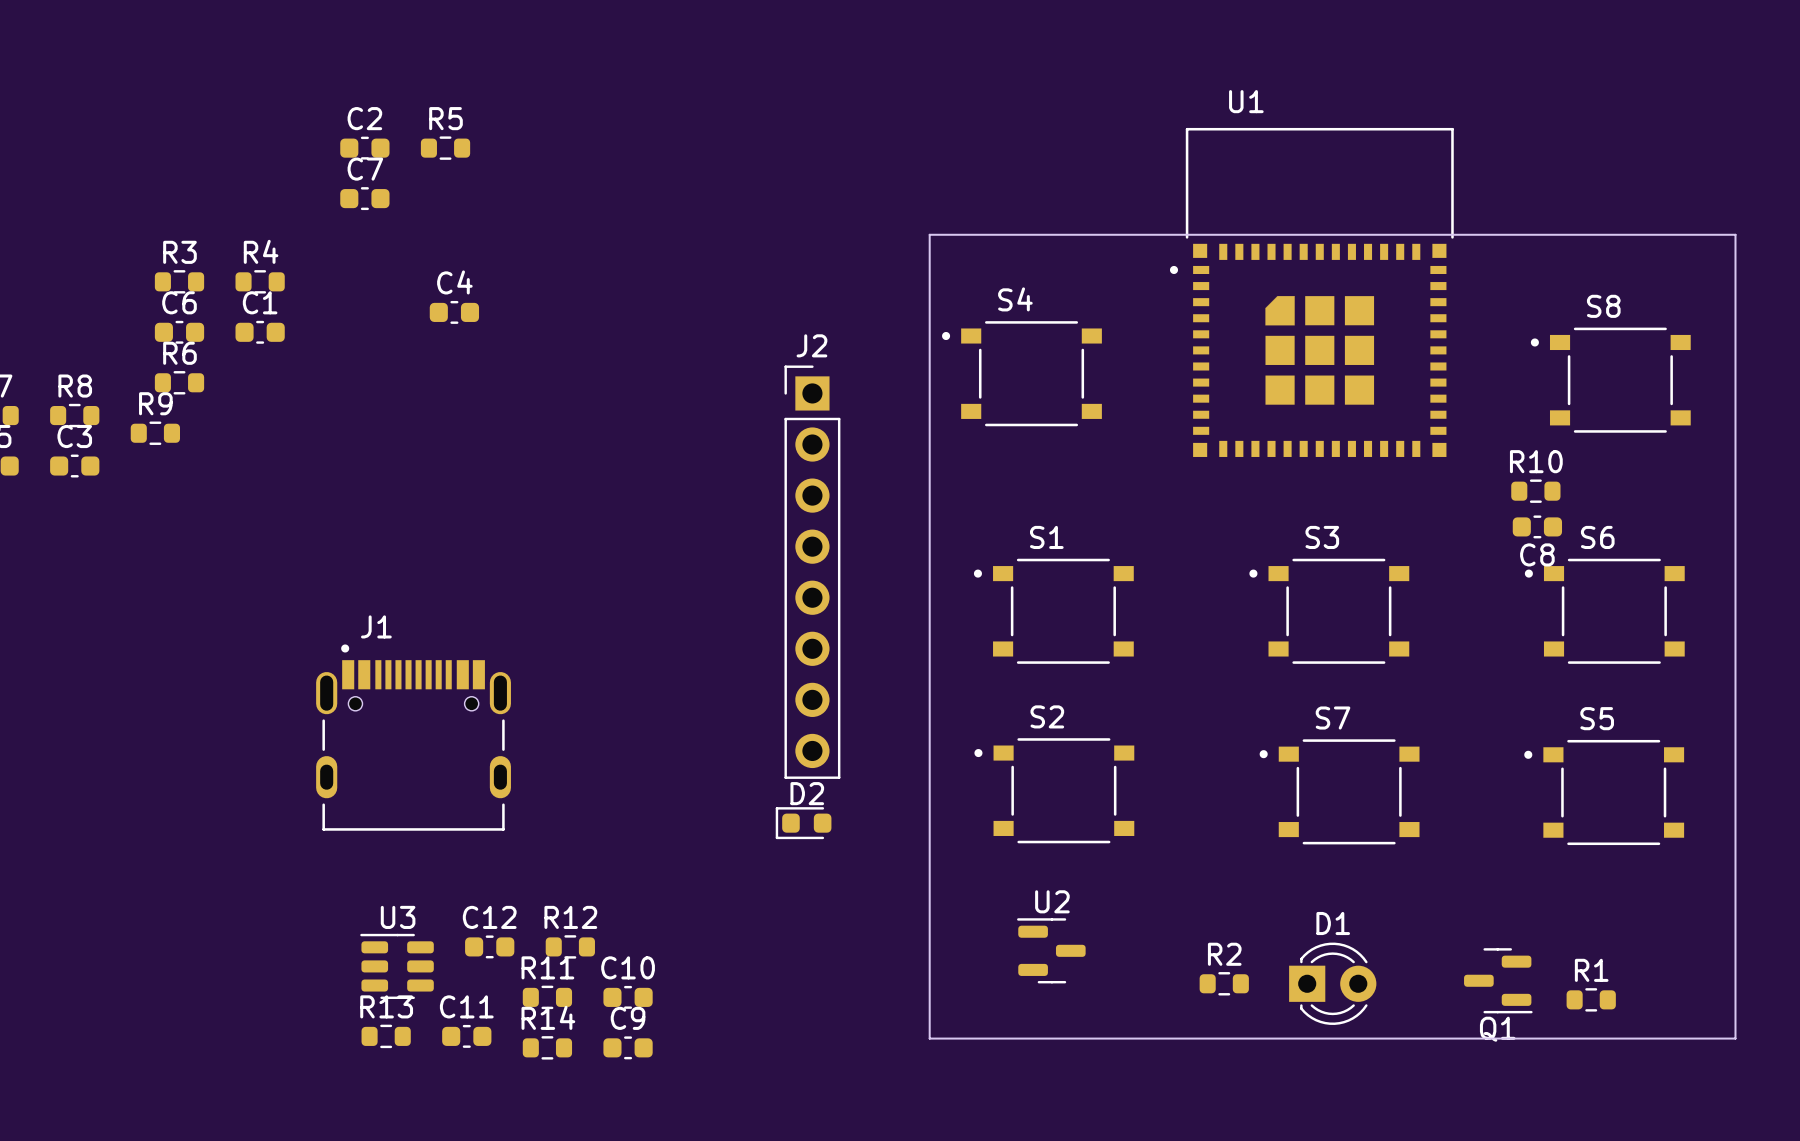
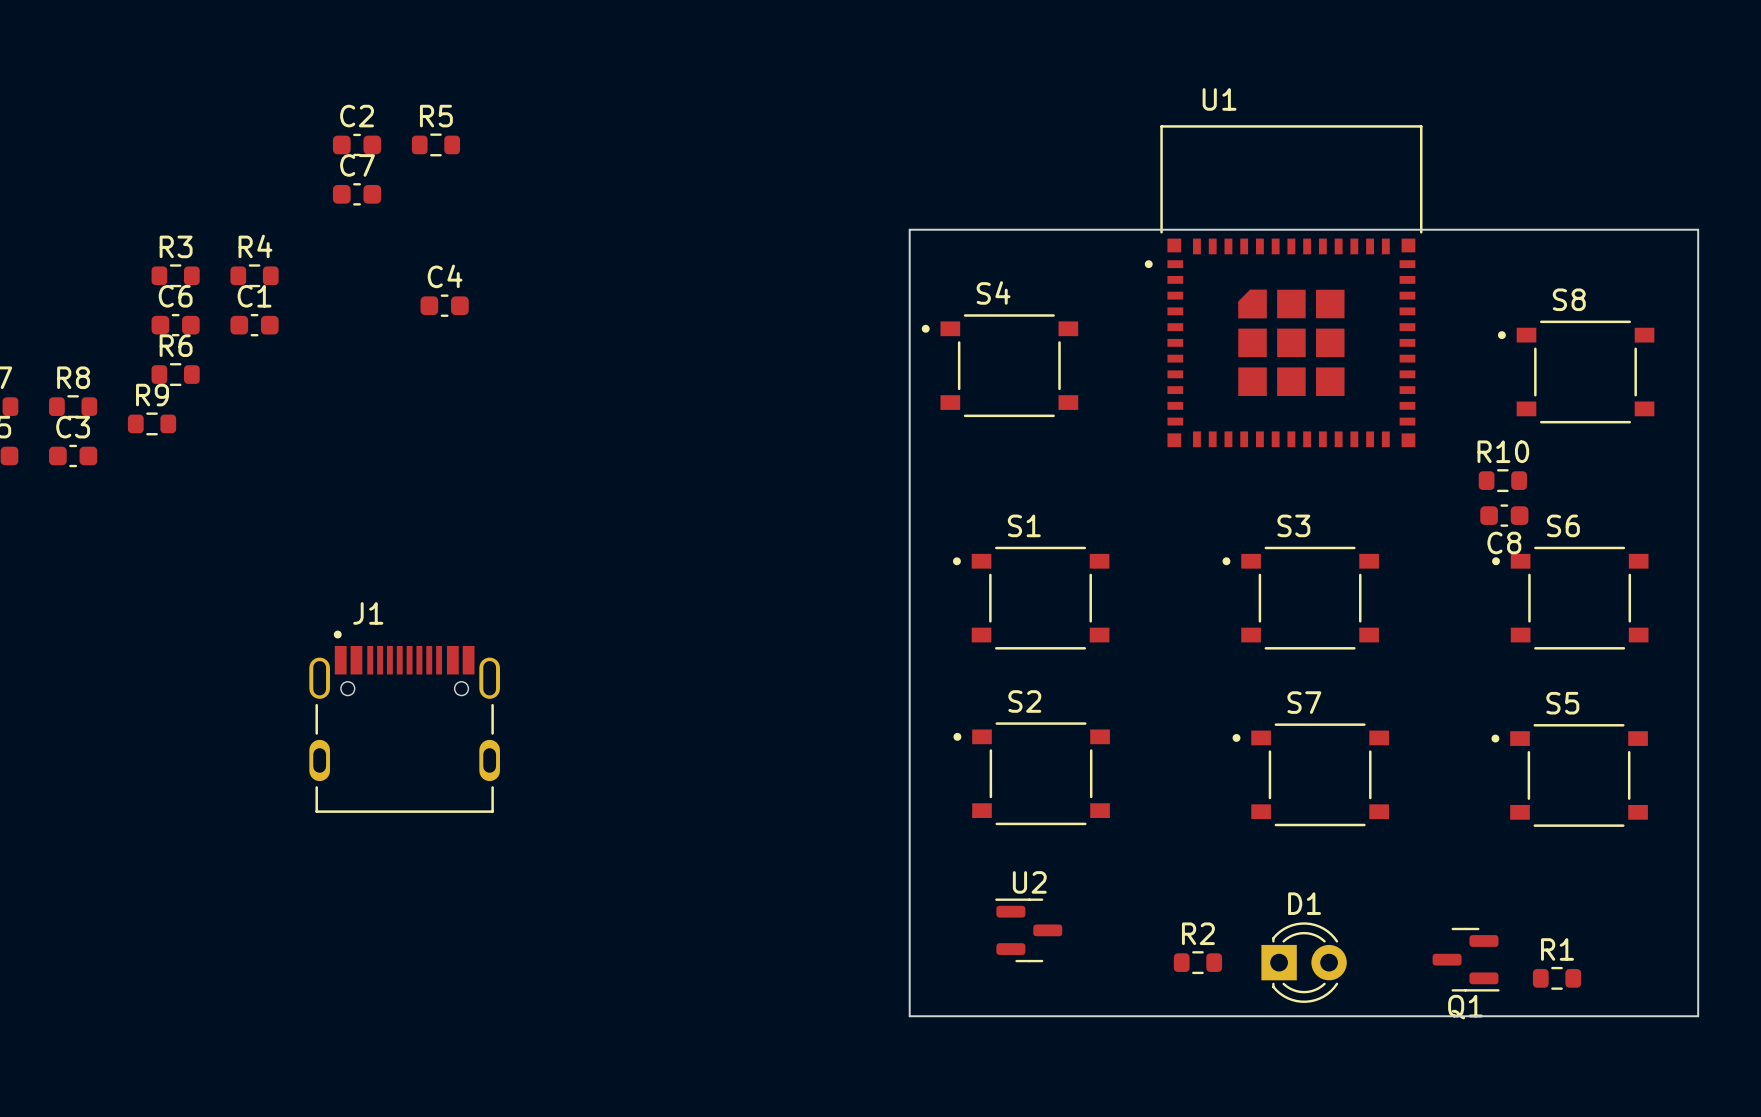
J2: (812, 572) -> none
D2: (803, 823) -> none
C12: (489, 946) -> none
R12: (570, 946) -> none
U3: (397, 966) -> none
R11: (547, 997) -> none
C10: (628, 997) -> none
R13: (386, 1036) -> none
C11: (466, 1036) -> none
R14: (547, 1047) -> none
C9: (628, 1047) -> none

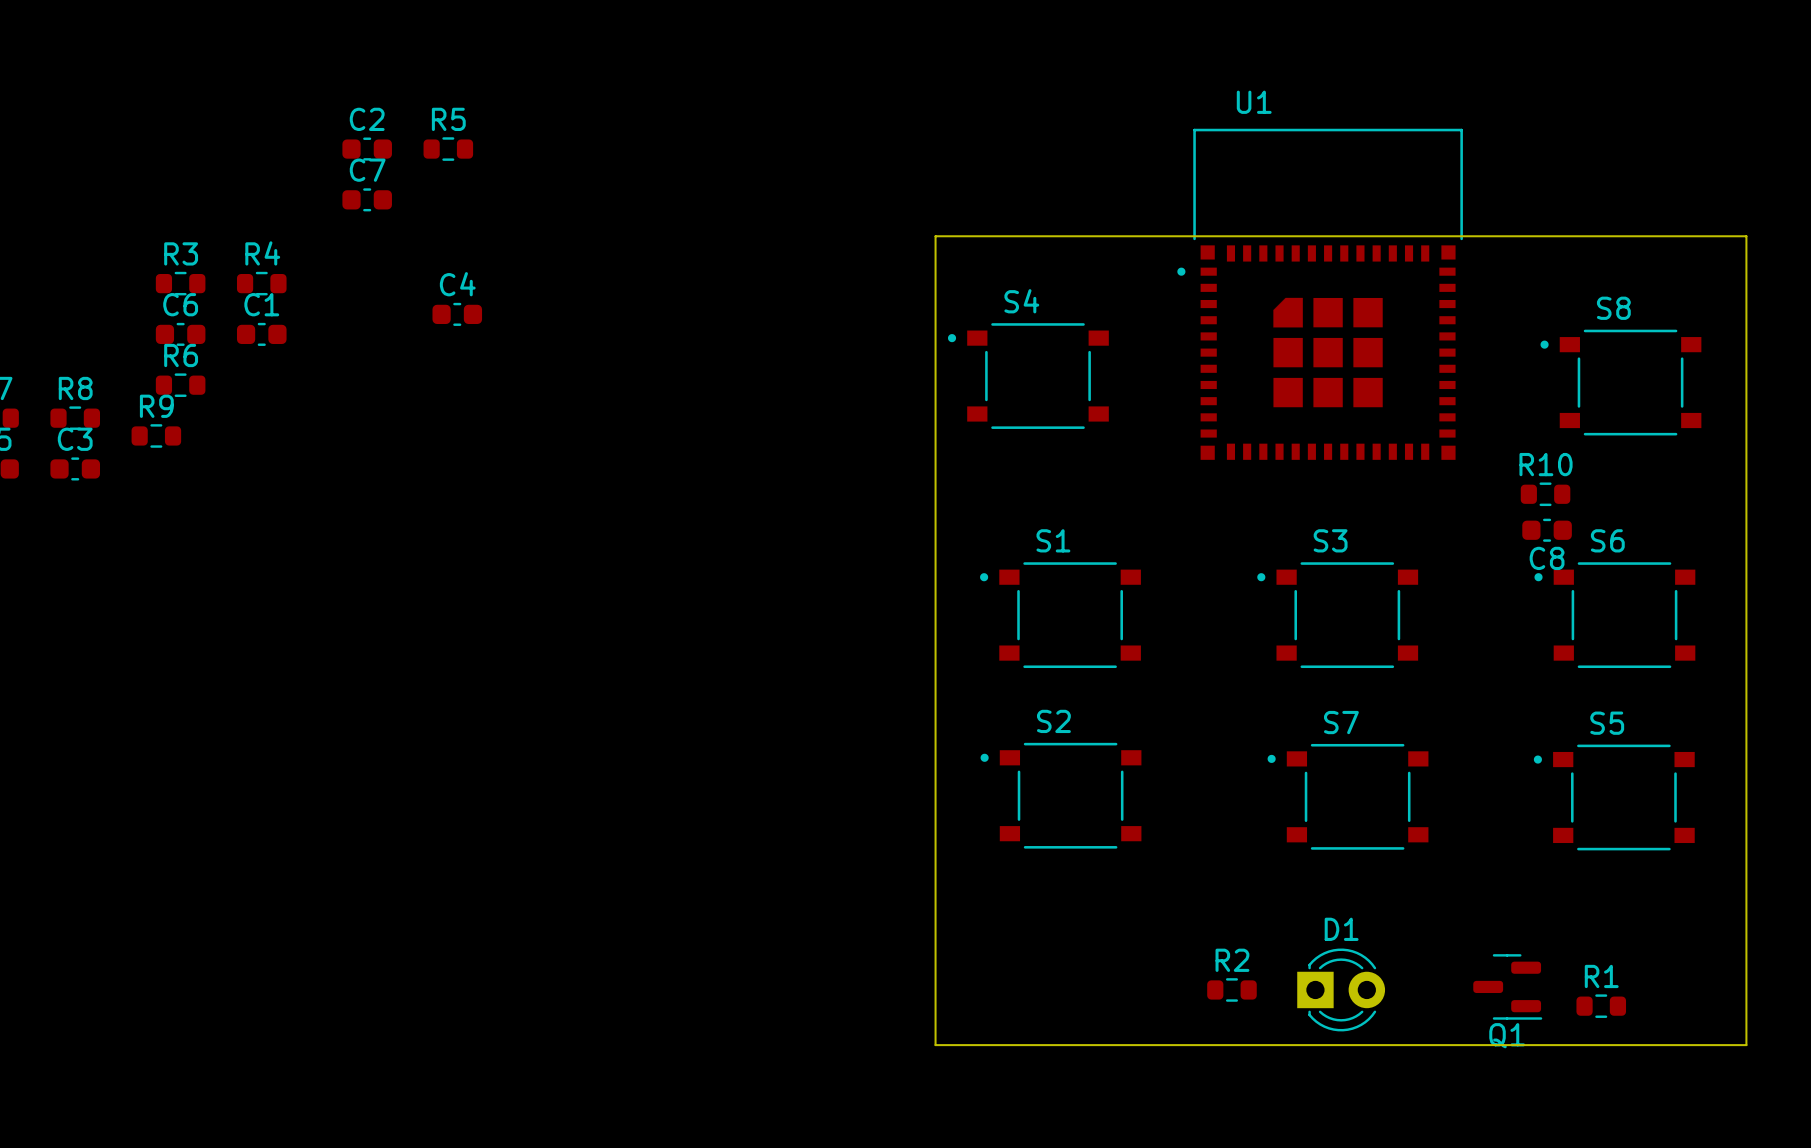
J1: (404, 721) -> none
U2: (1028, 930) -> none

